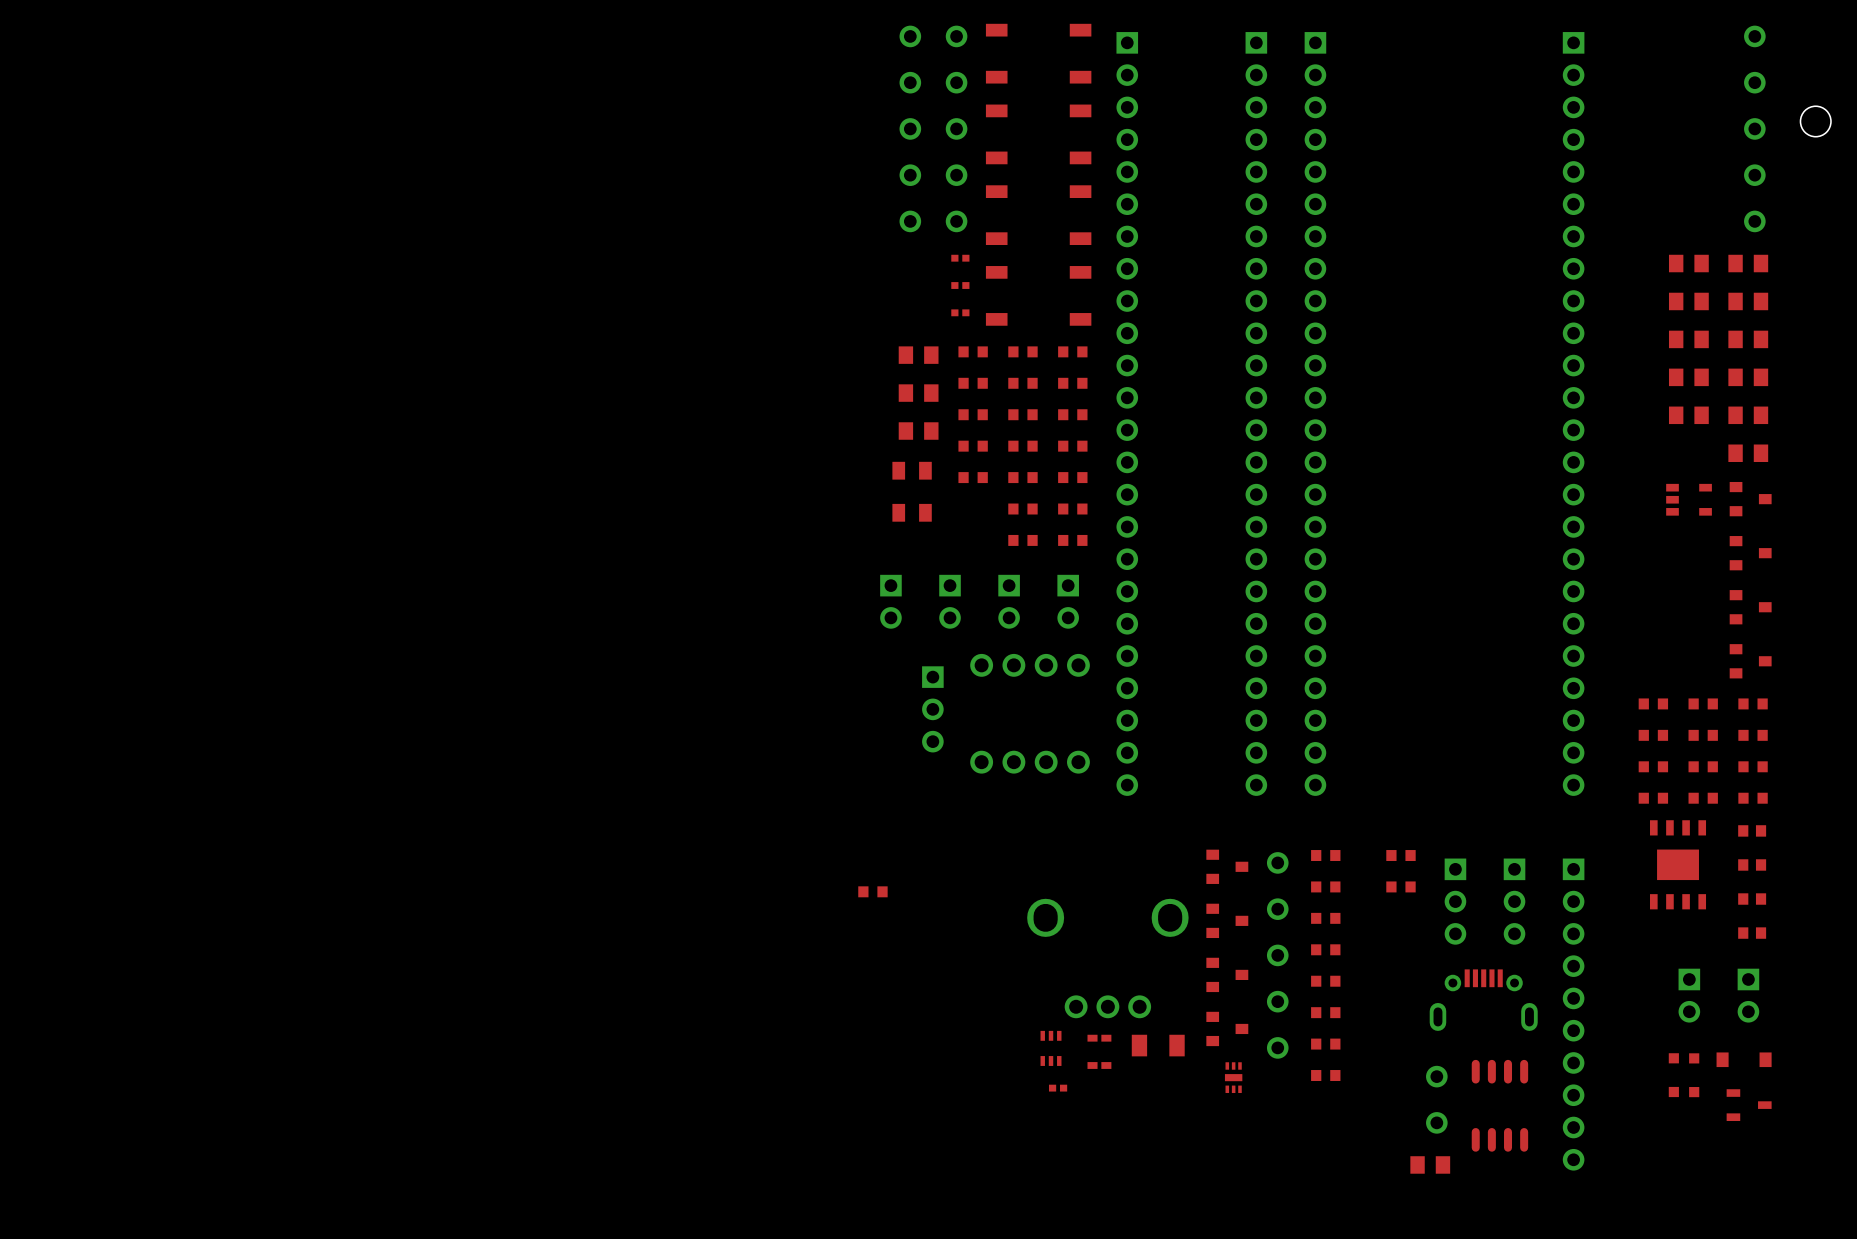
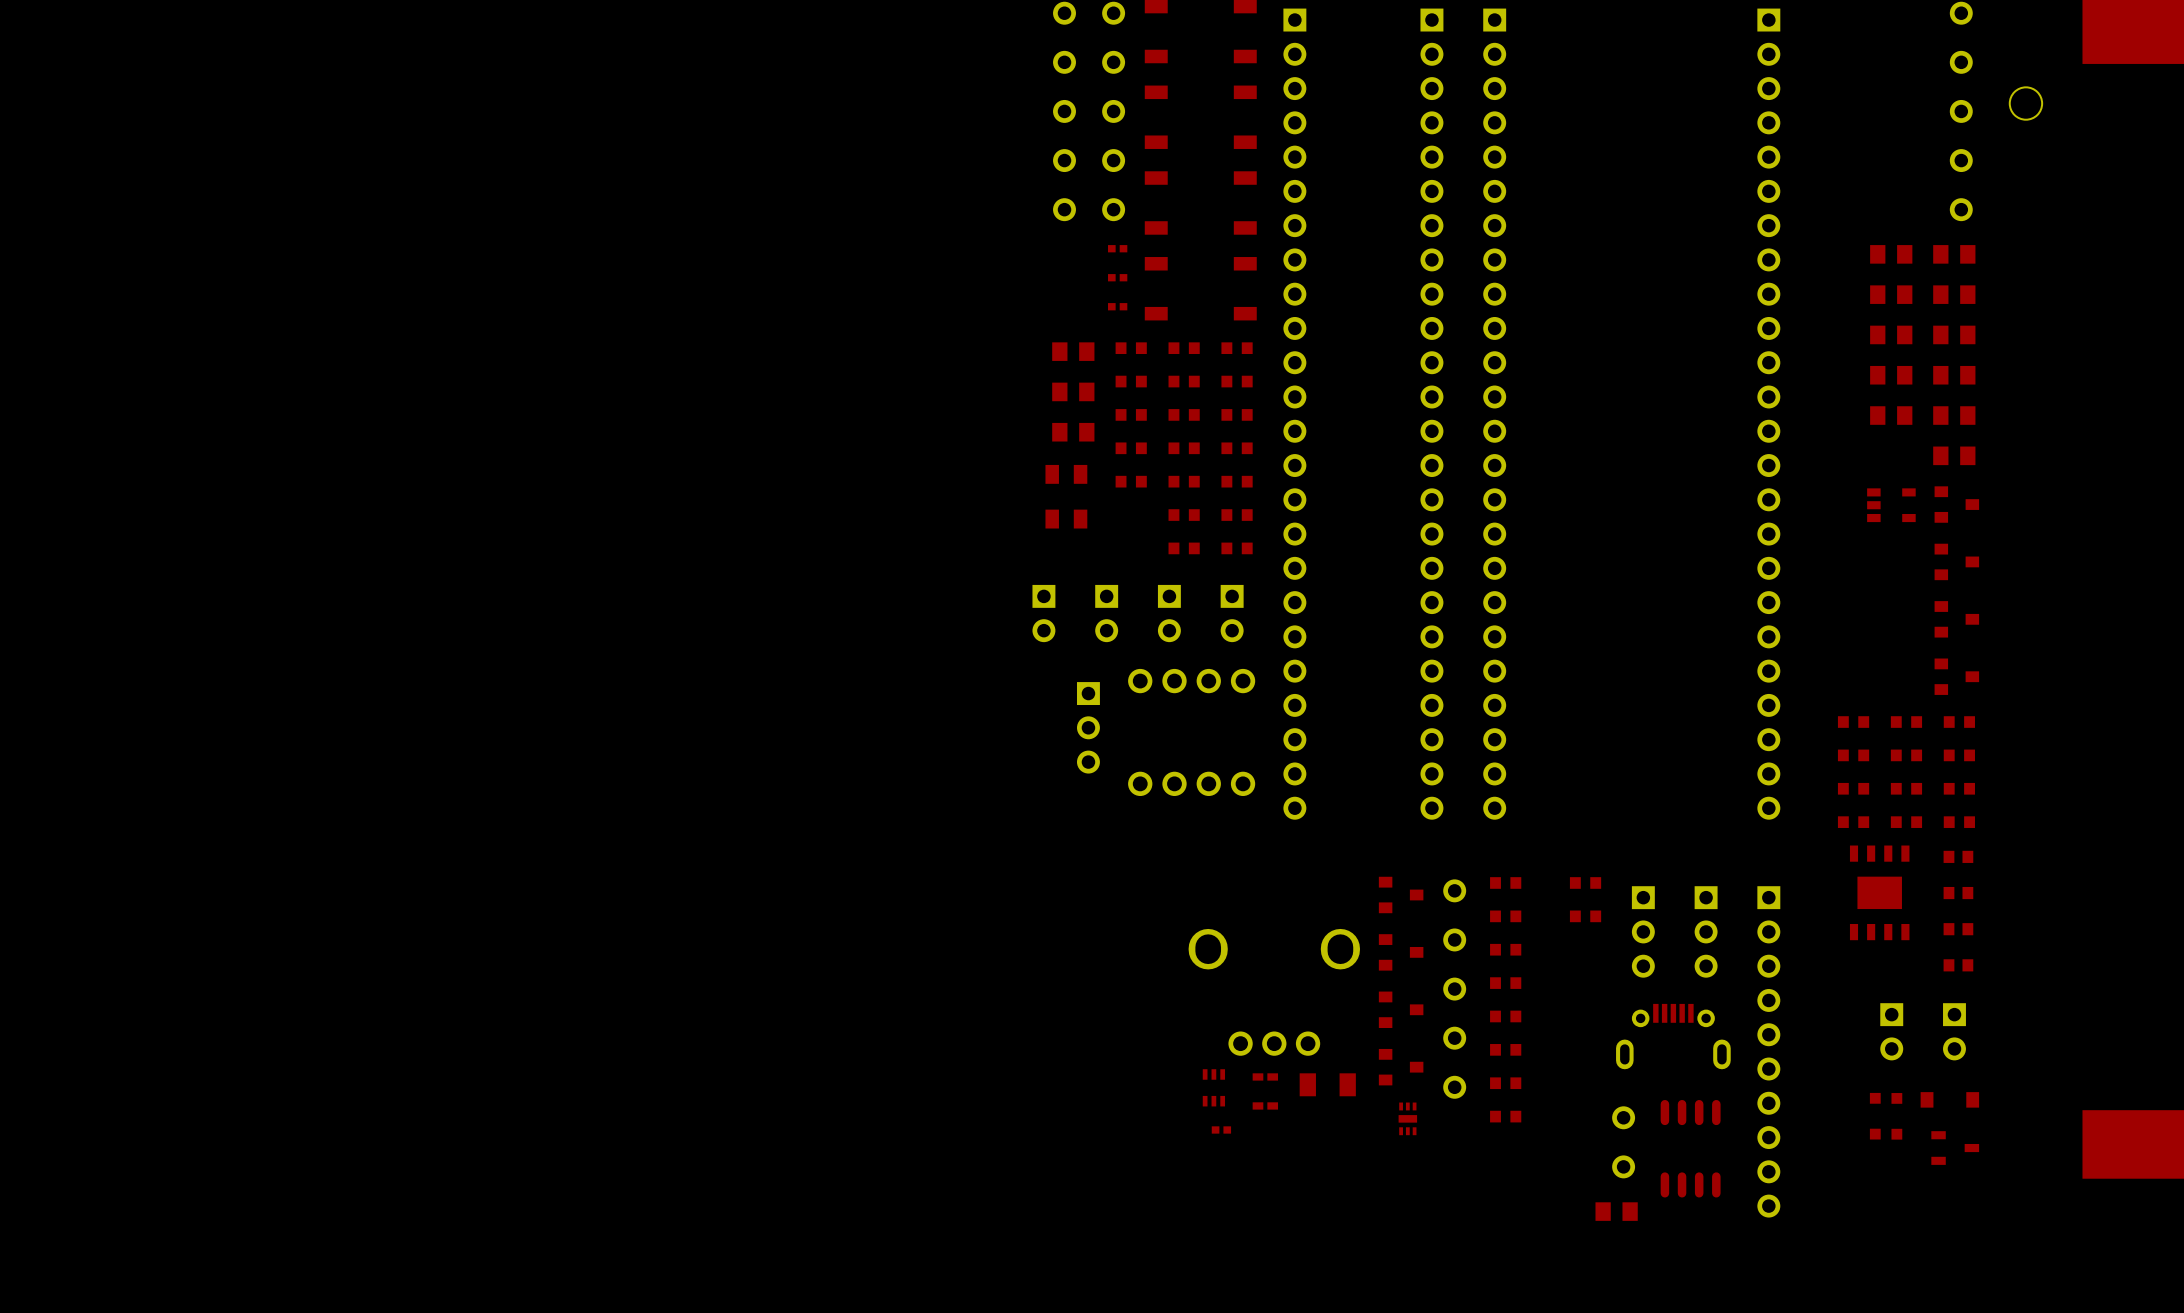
part: (872, 891) -> none

